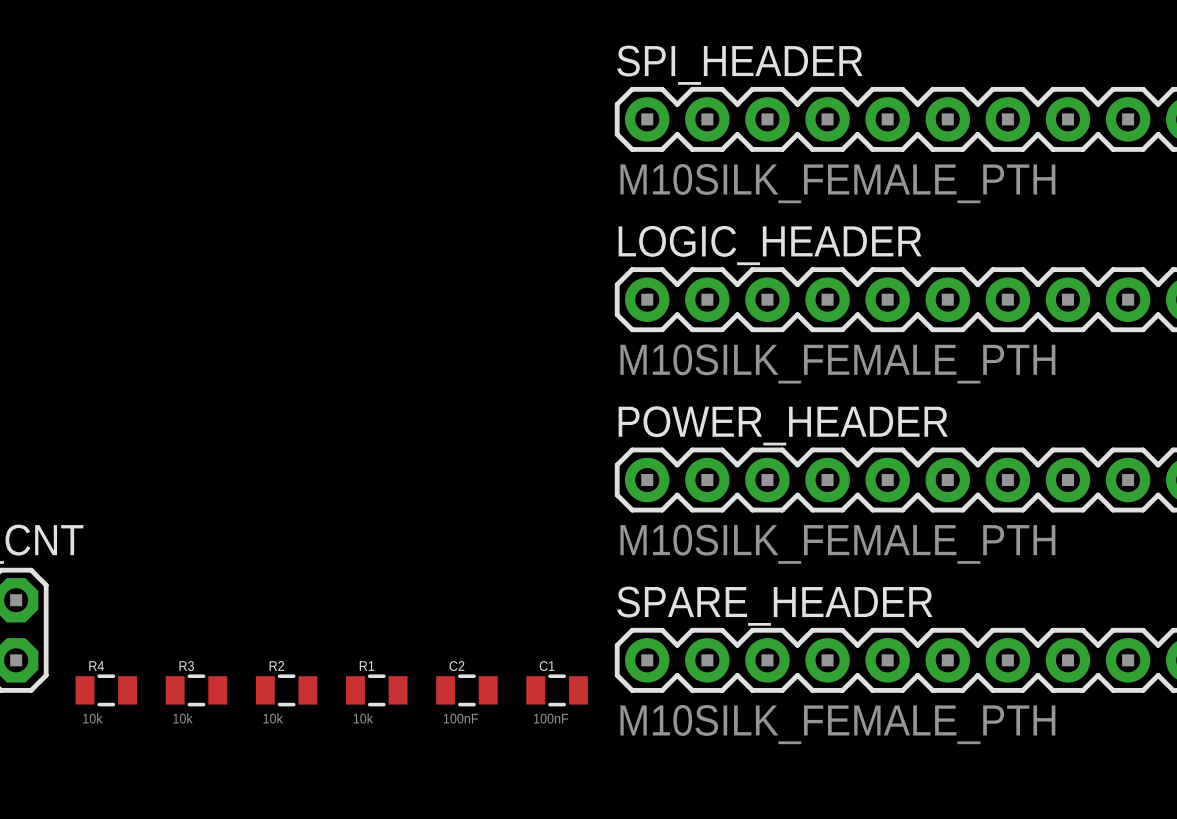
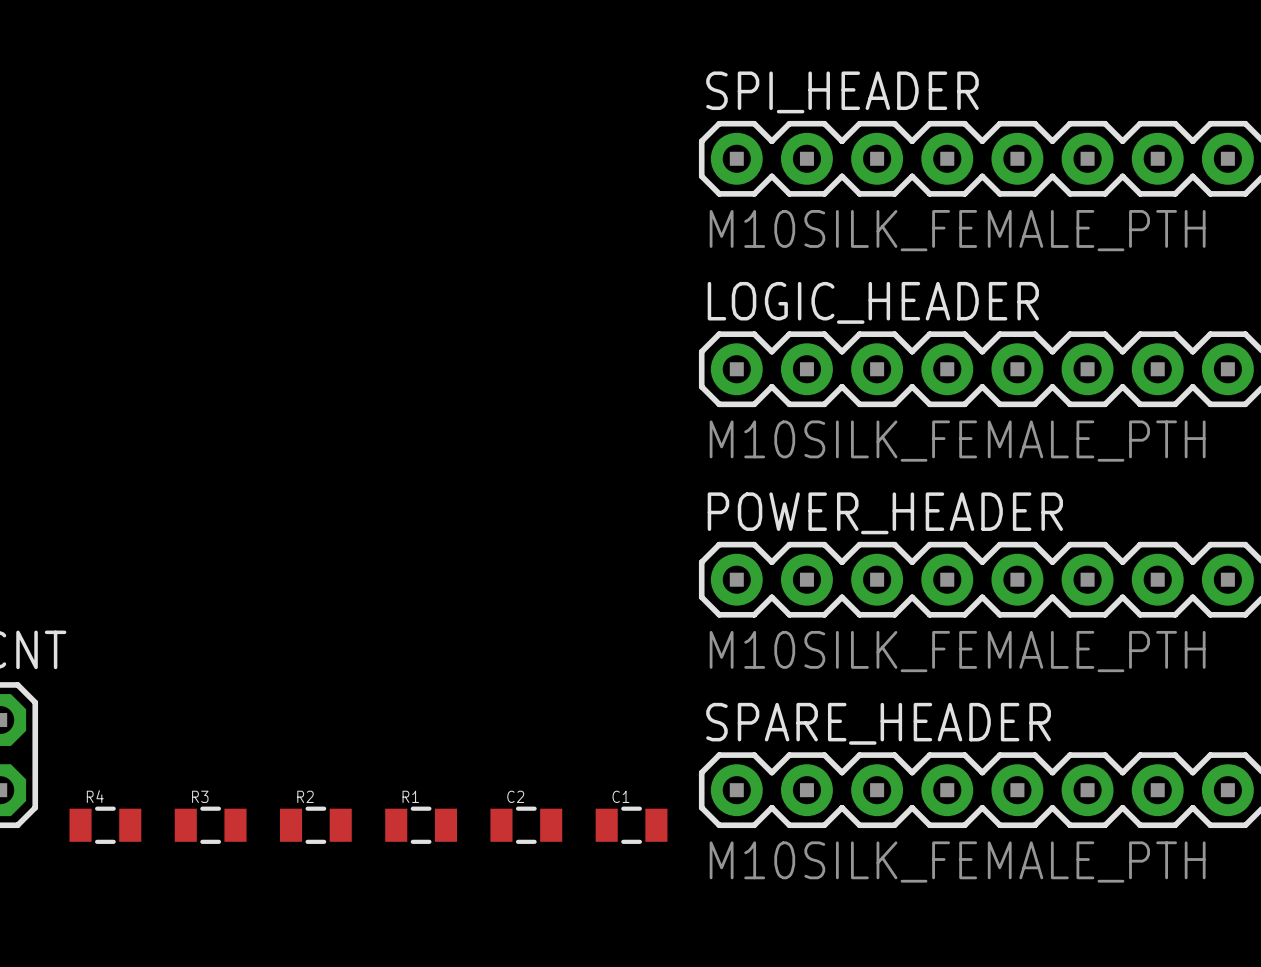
R4 value: 10k (92, 718) -> none
R3 value: 10k (183, 718) -> none
R2 value: 10k (273, 718) -> none
R1 value: 10k (363, 718) -> none
C2 value: 100nF (460, 718) -> none
C1 value: 100nF (551, 718) -> none

